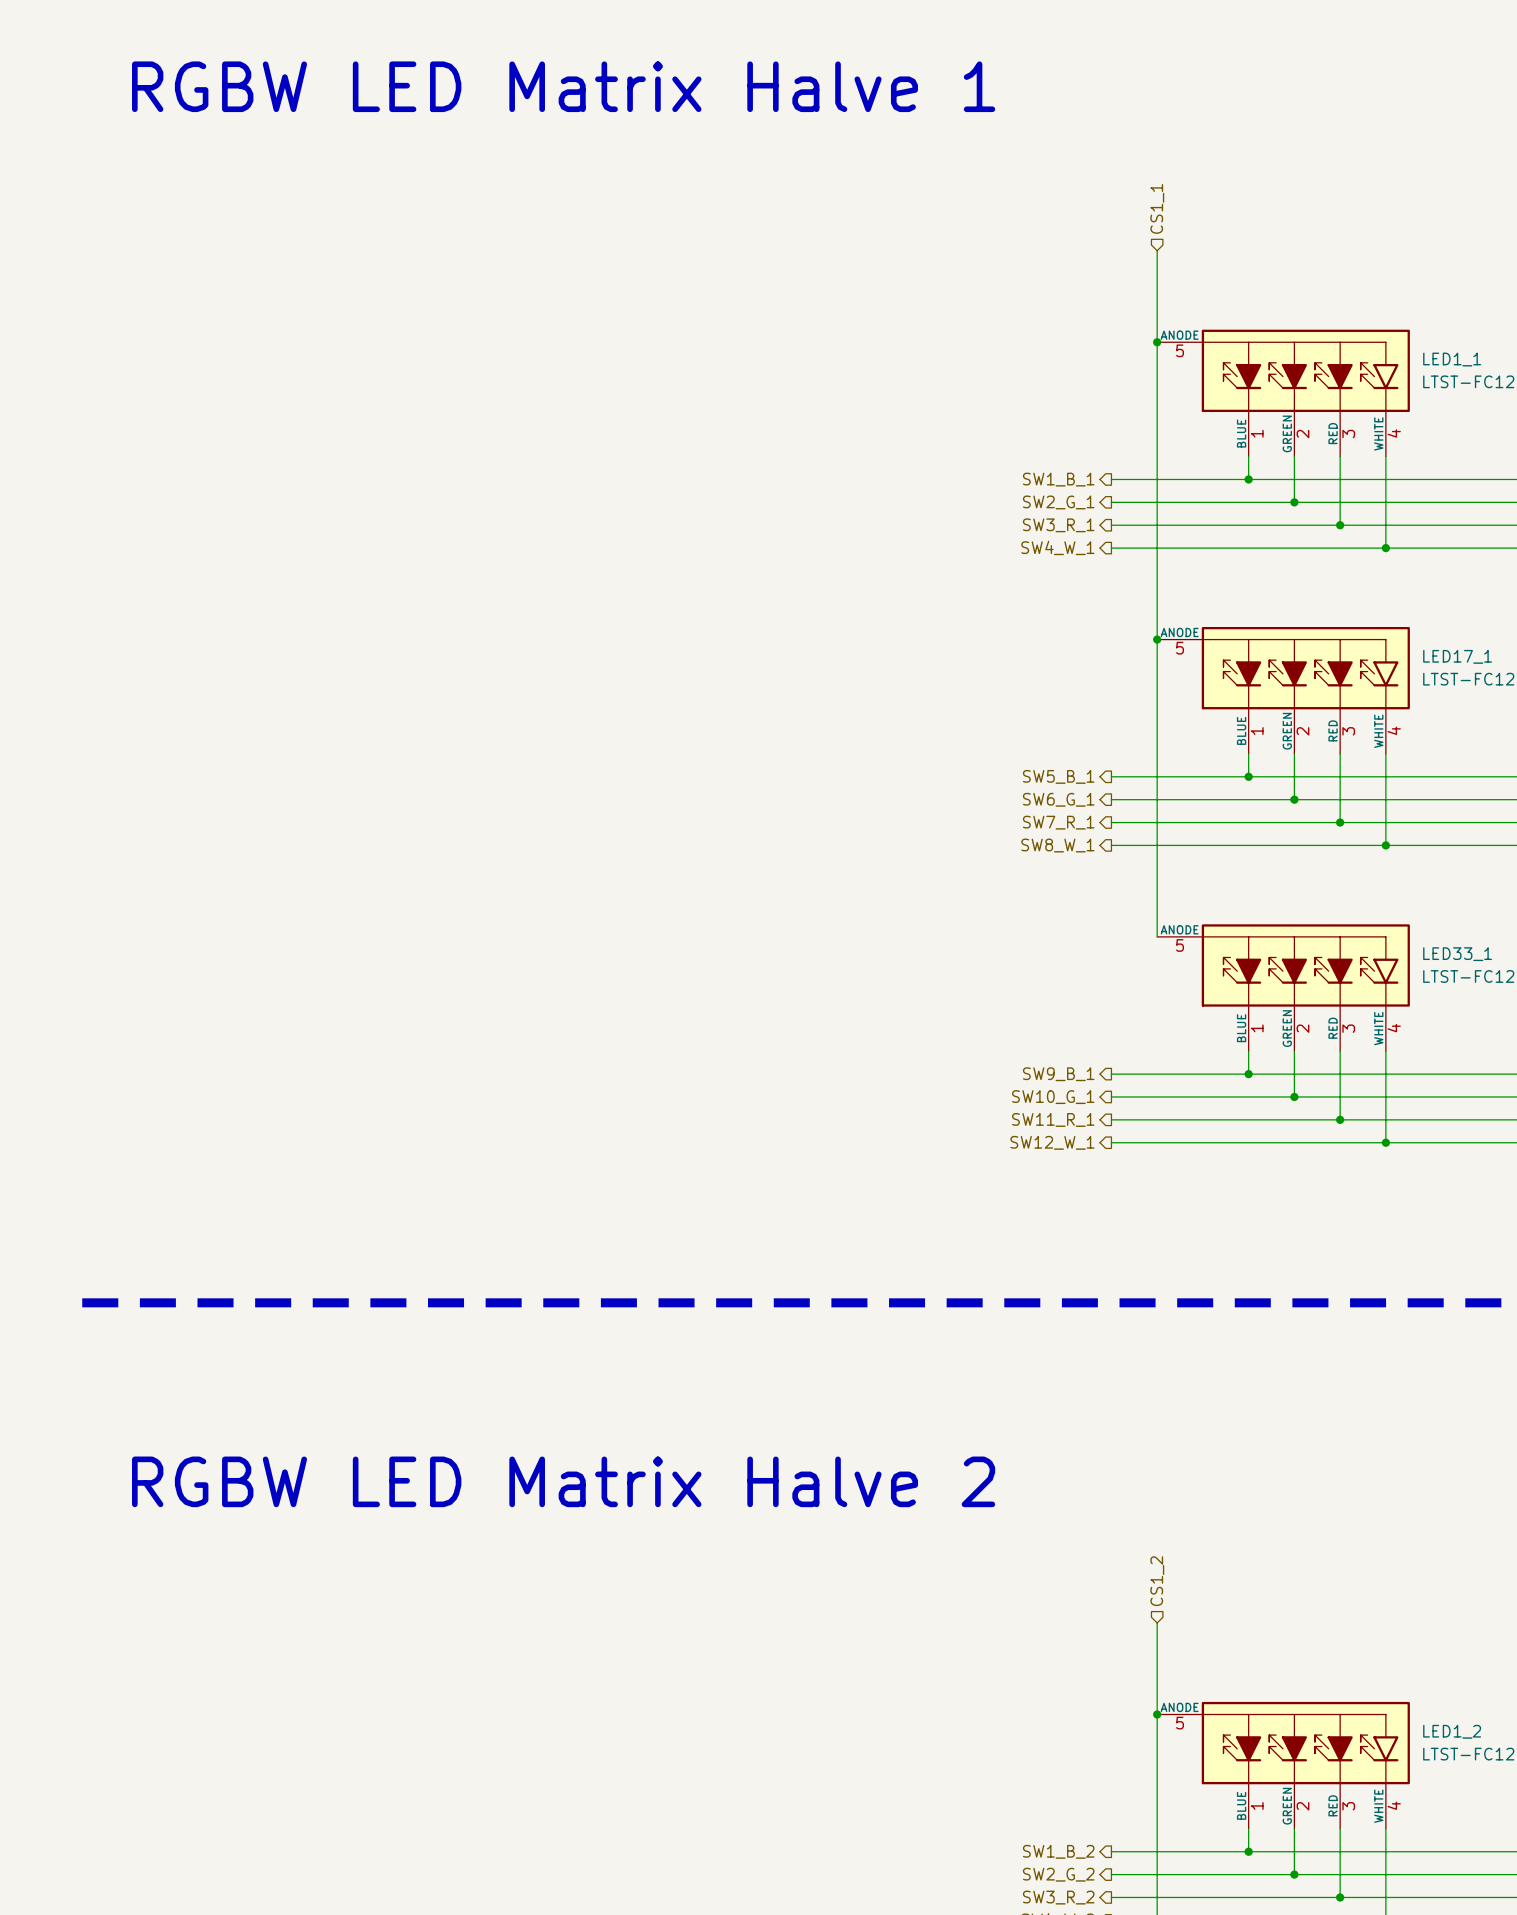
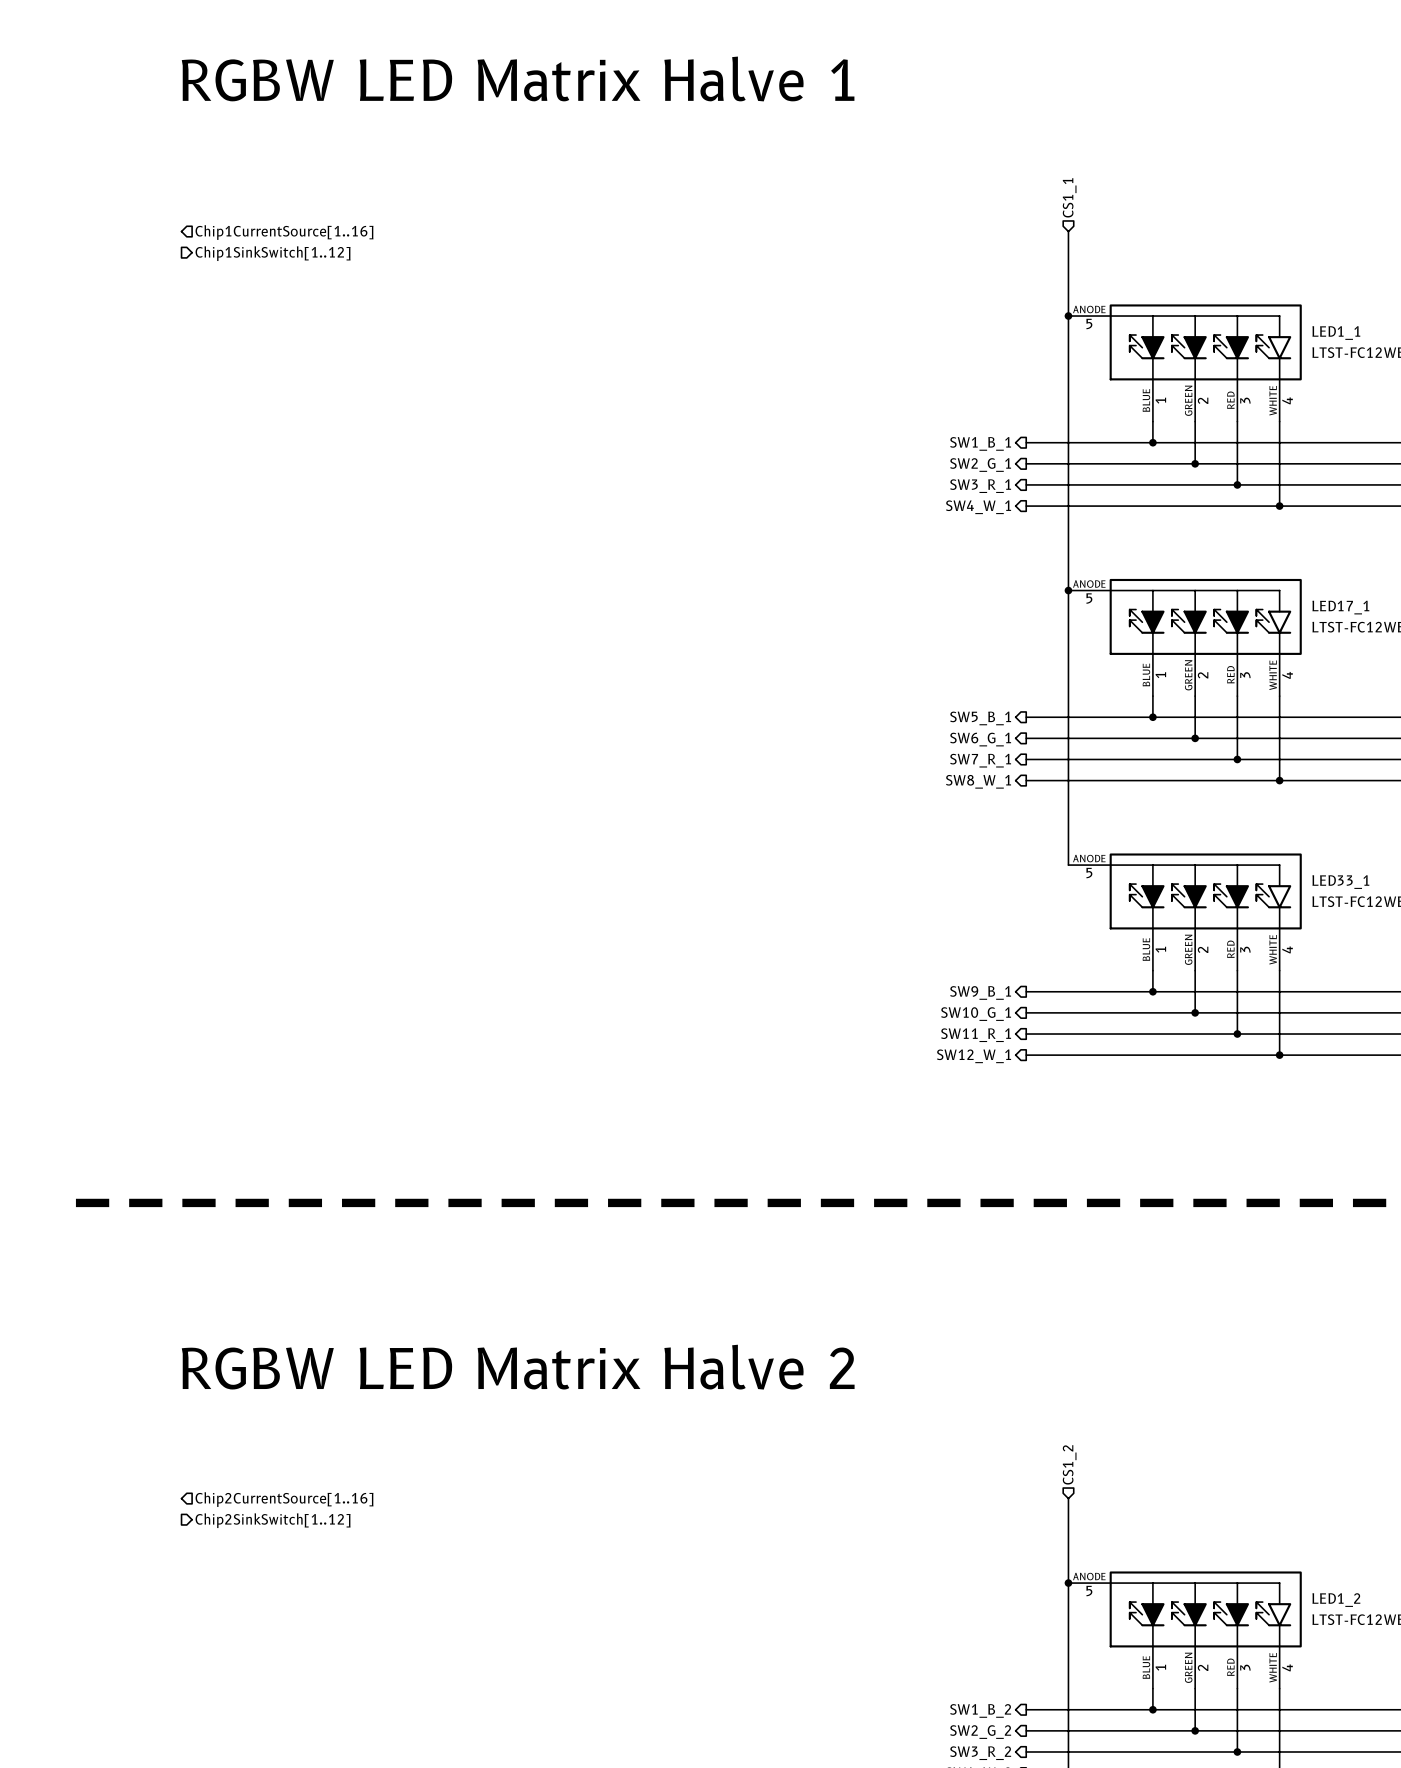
hierarchical label: none -> Chip1CurrentSource[1..16] (284, 232)
hierarchical label: none -> Chip1SinkSwitch[1..12] (273, 253)
hierarchical label: none -> Chip2CurrentSource[1..16] (284, 1499)
hierarchical label: none -> Chip2SinkSwitch[1..12] (273, 1520)

